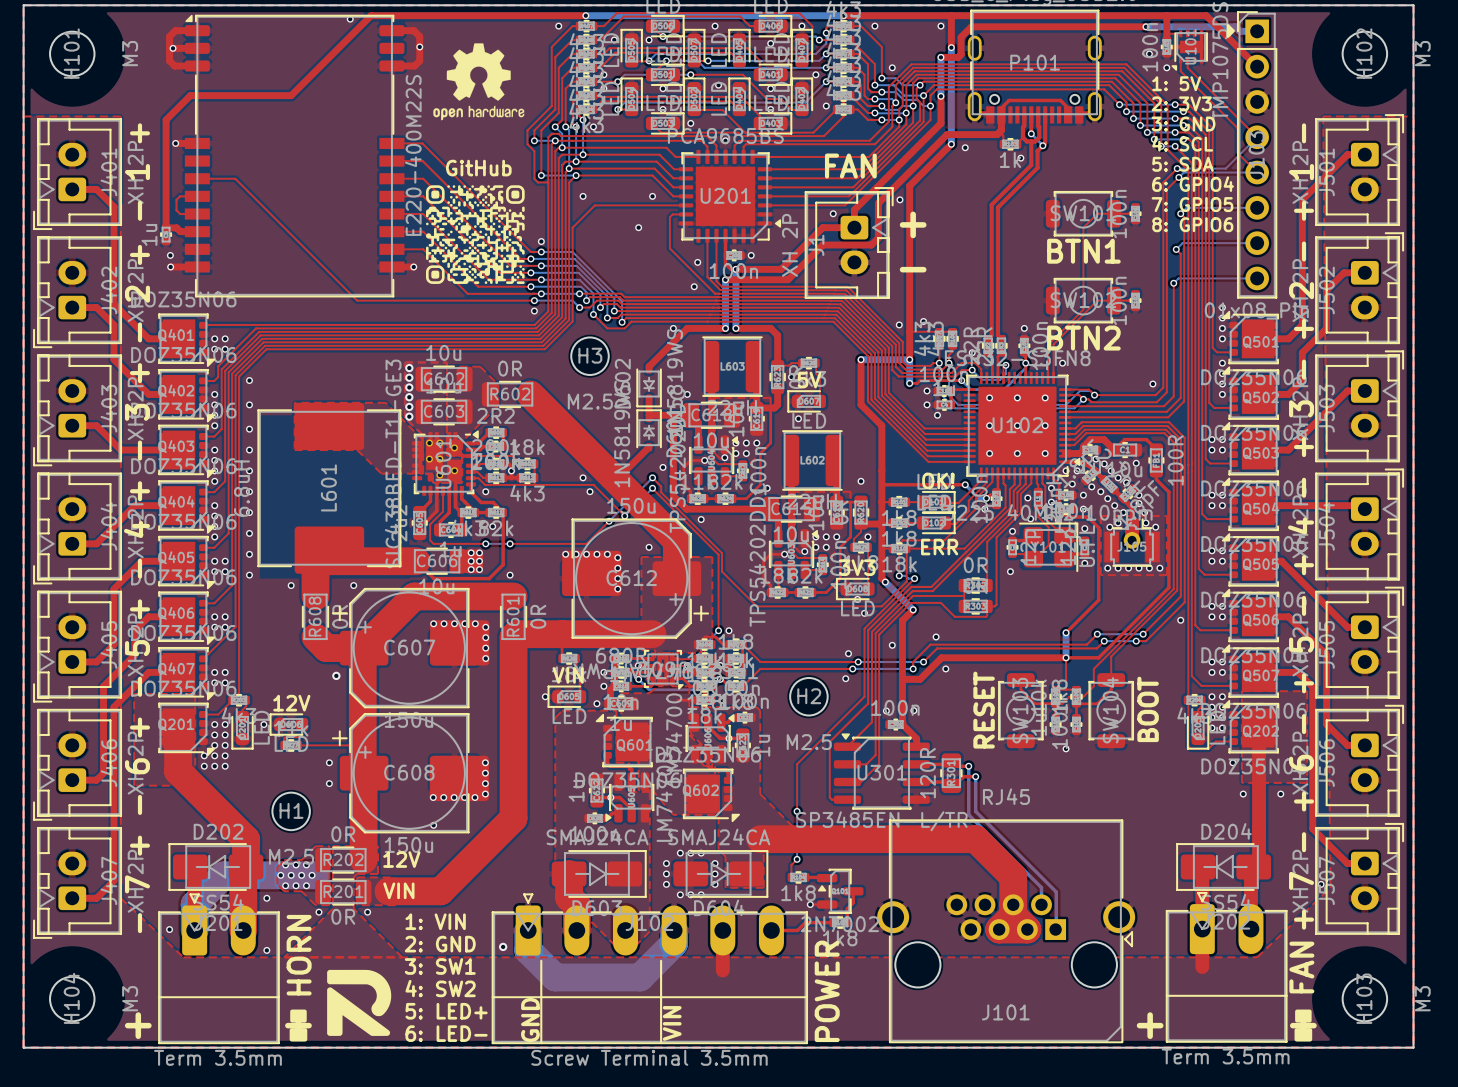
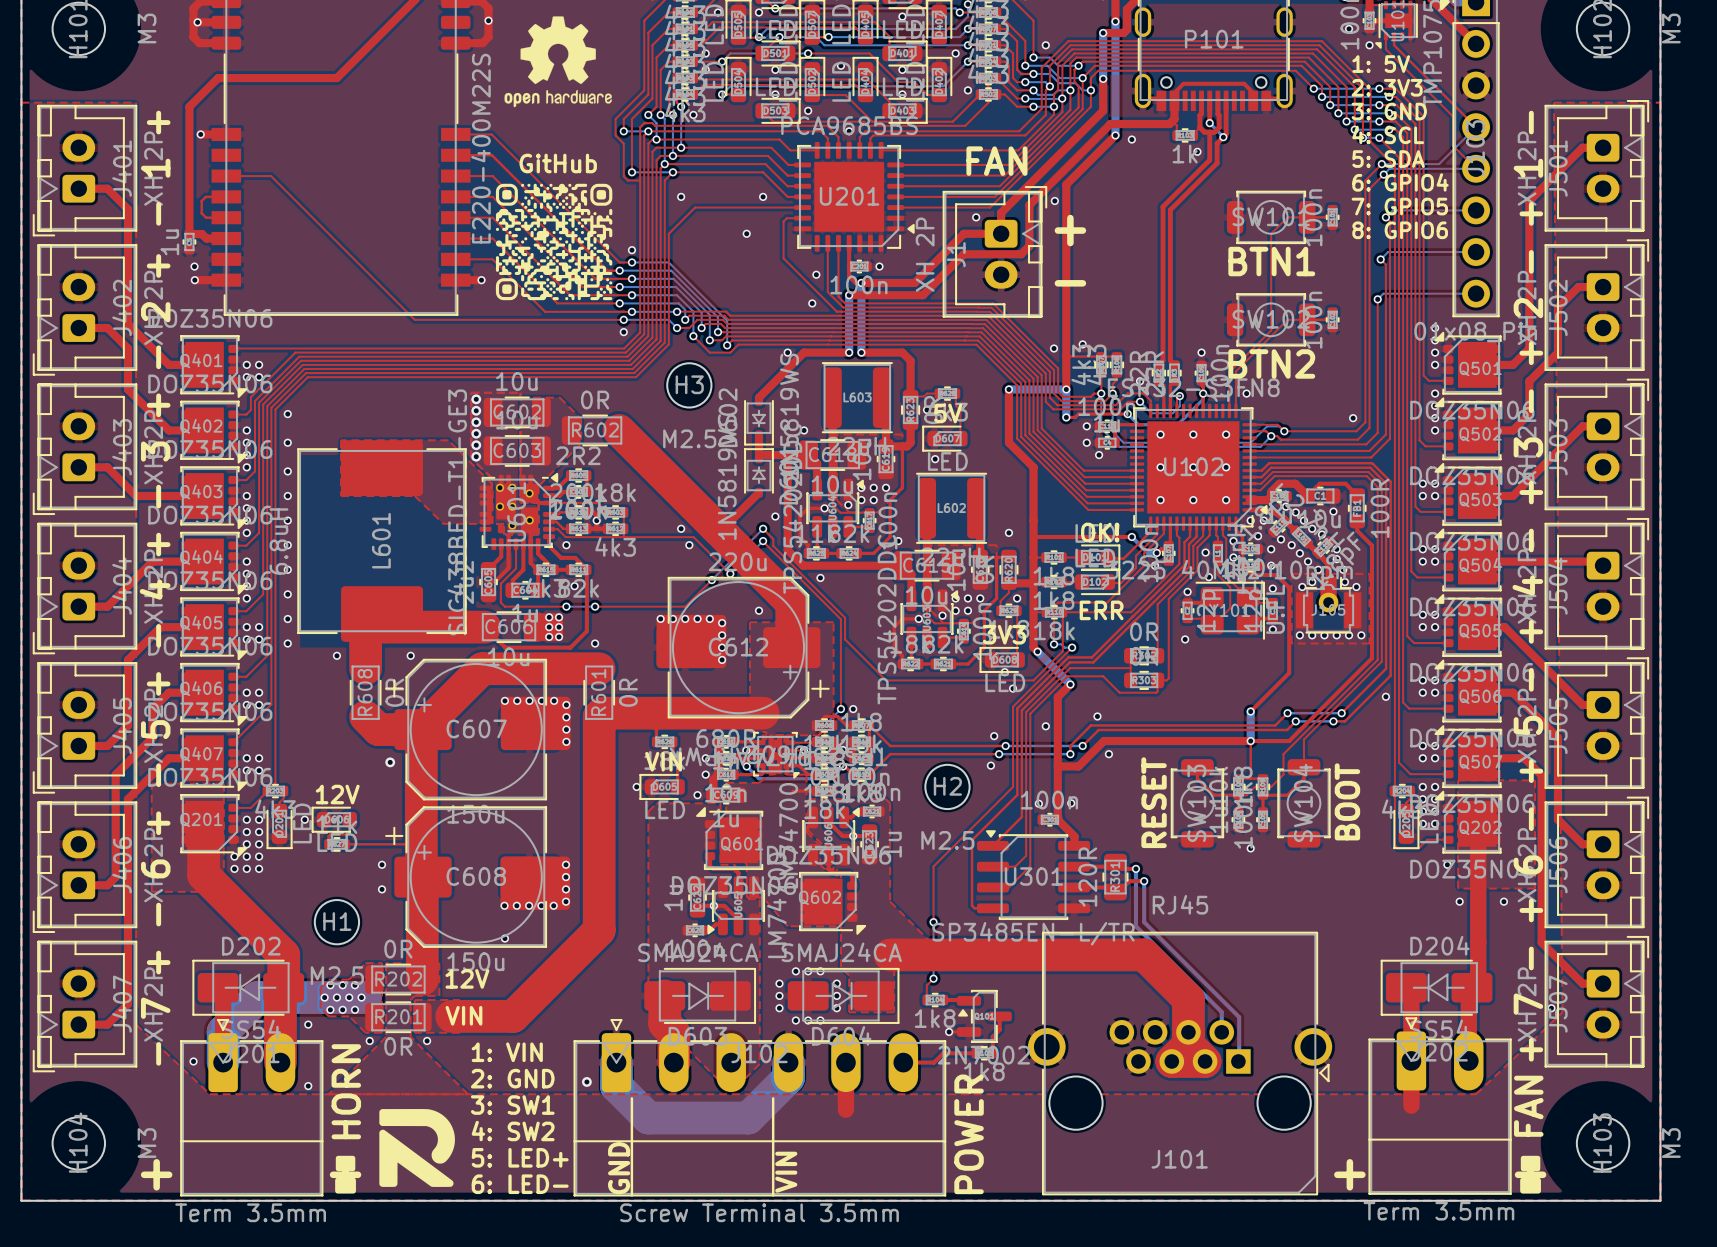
C612 value: 150u (631, 505) -> 220u (737, 561)

